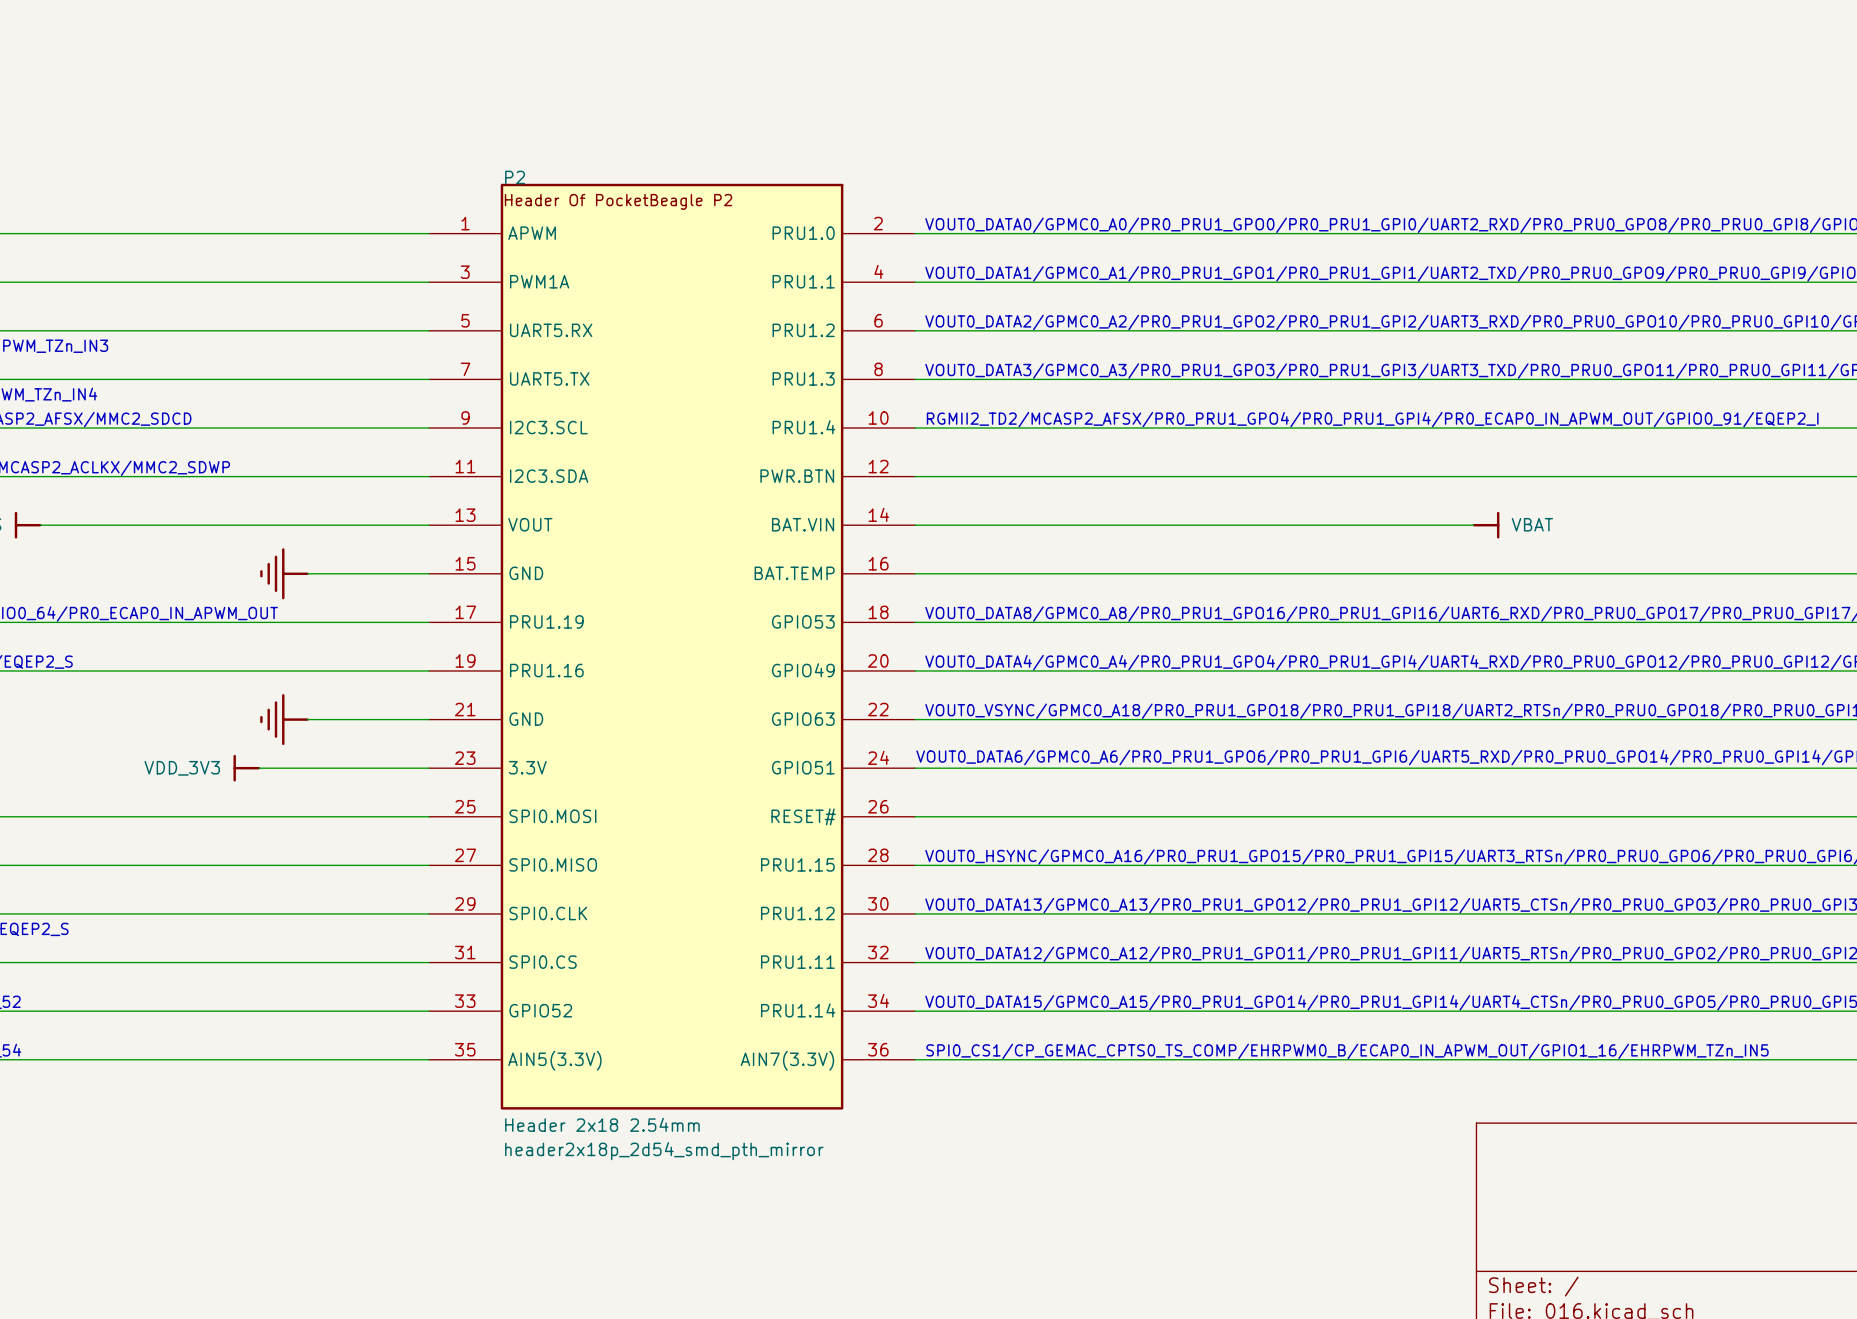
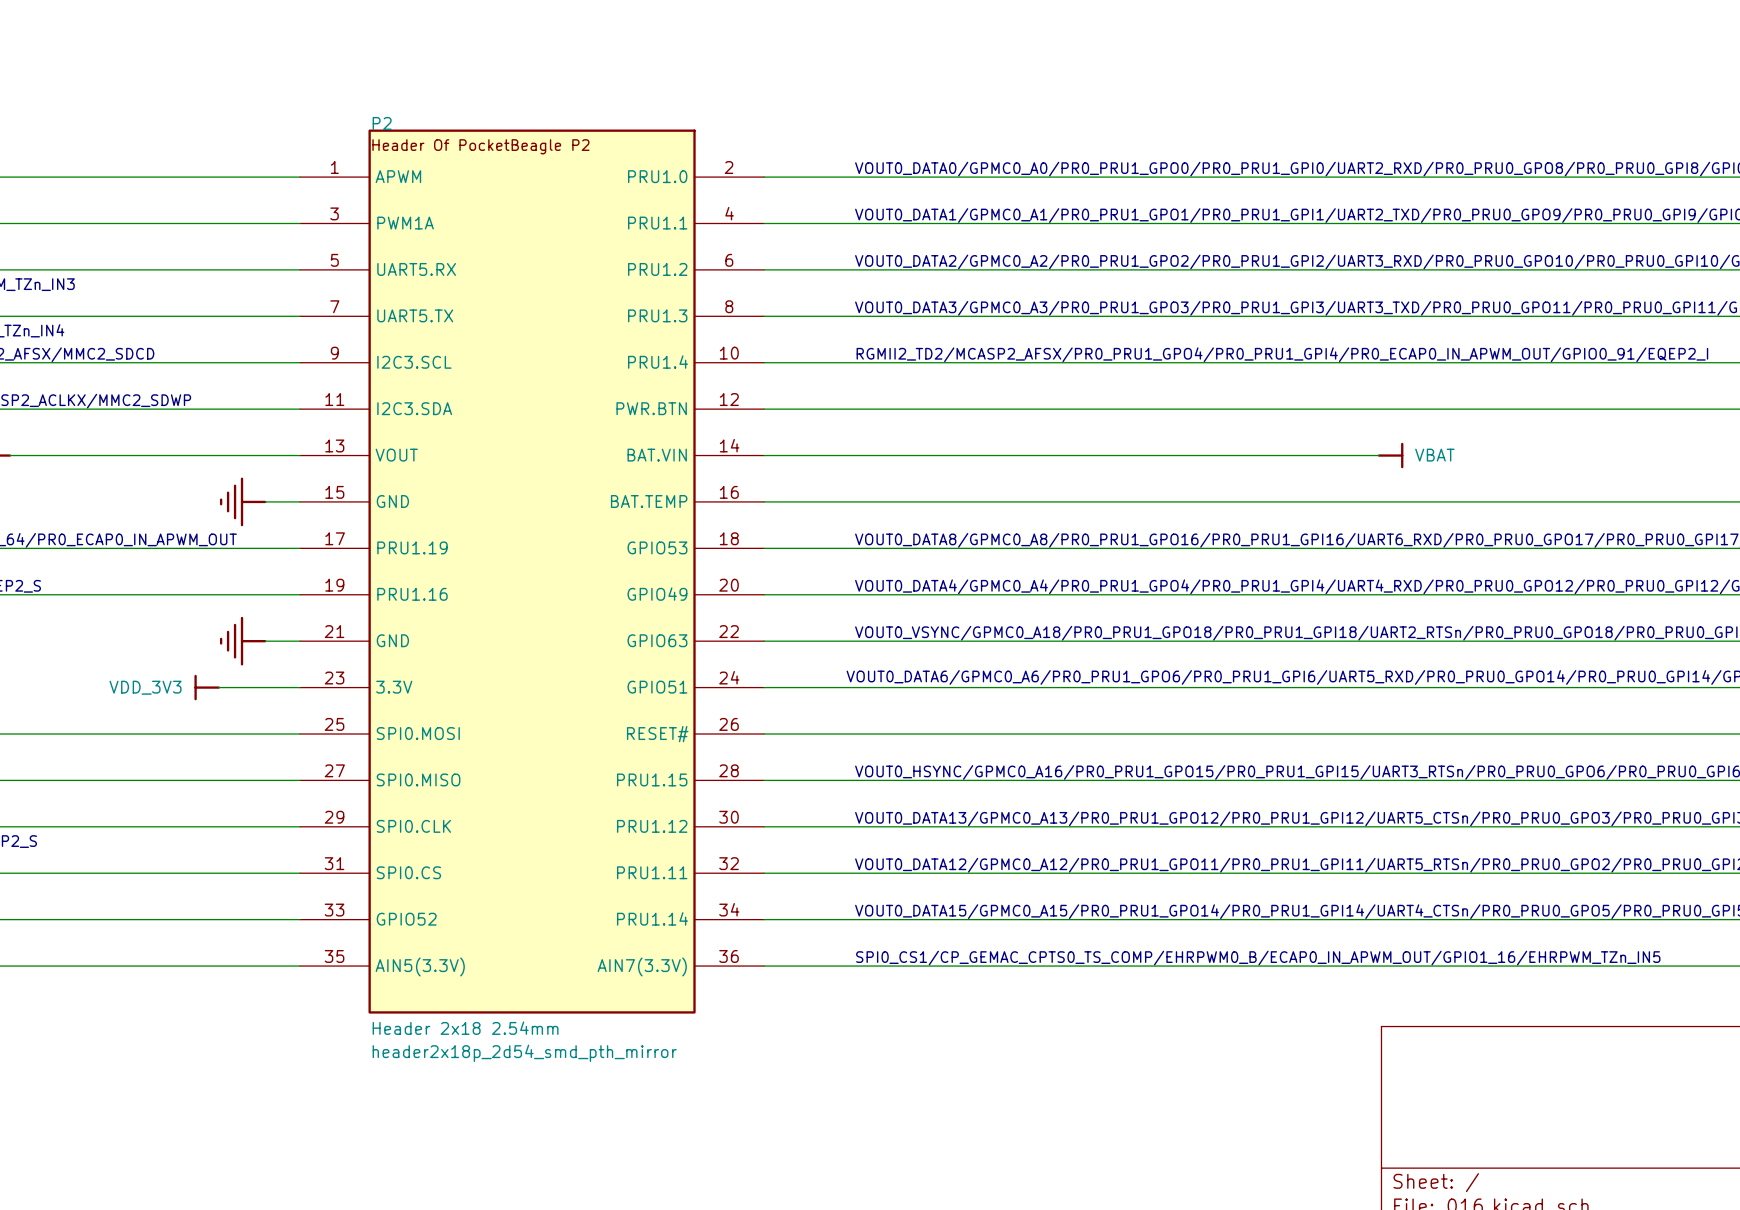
P2 position: (672, 646) -> (532, 571)

